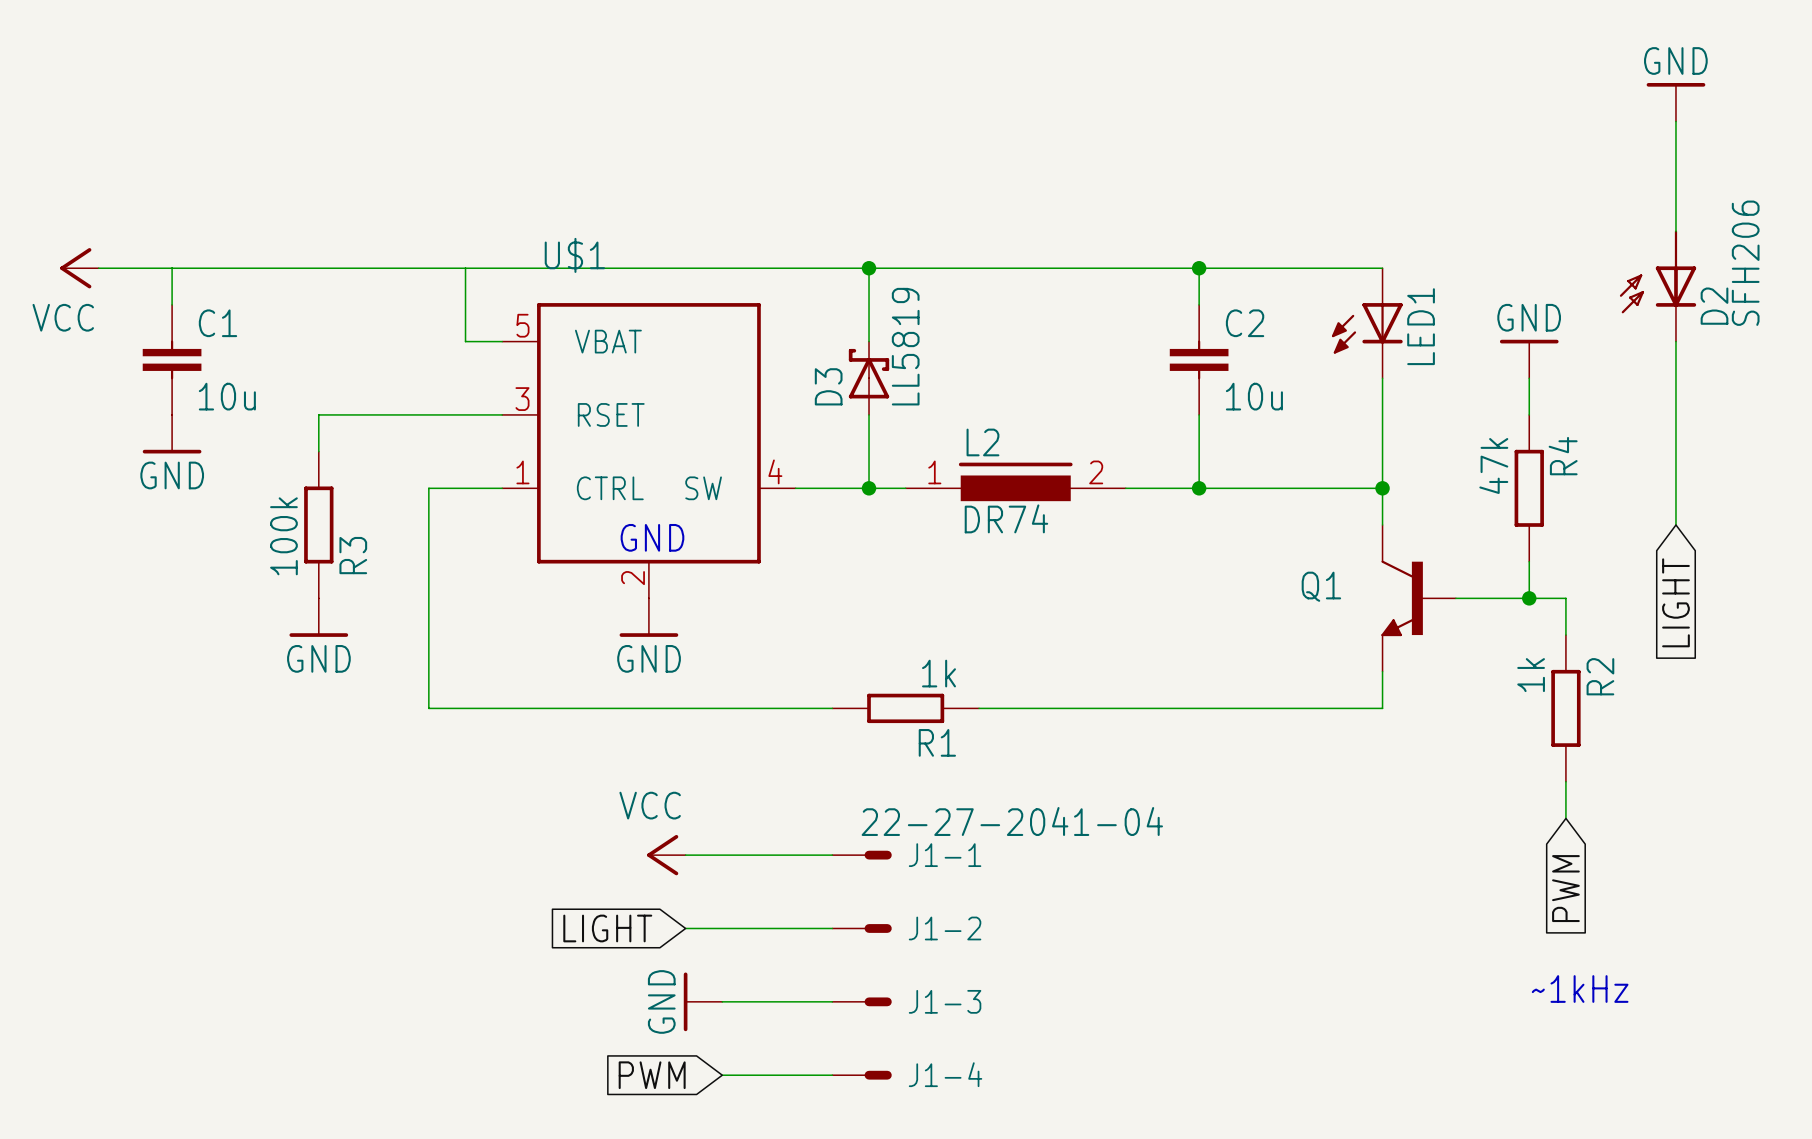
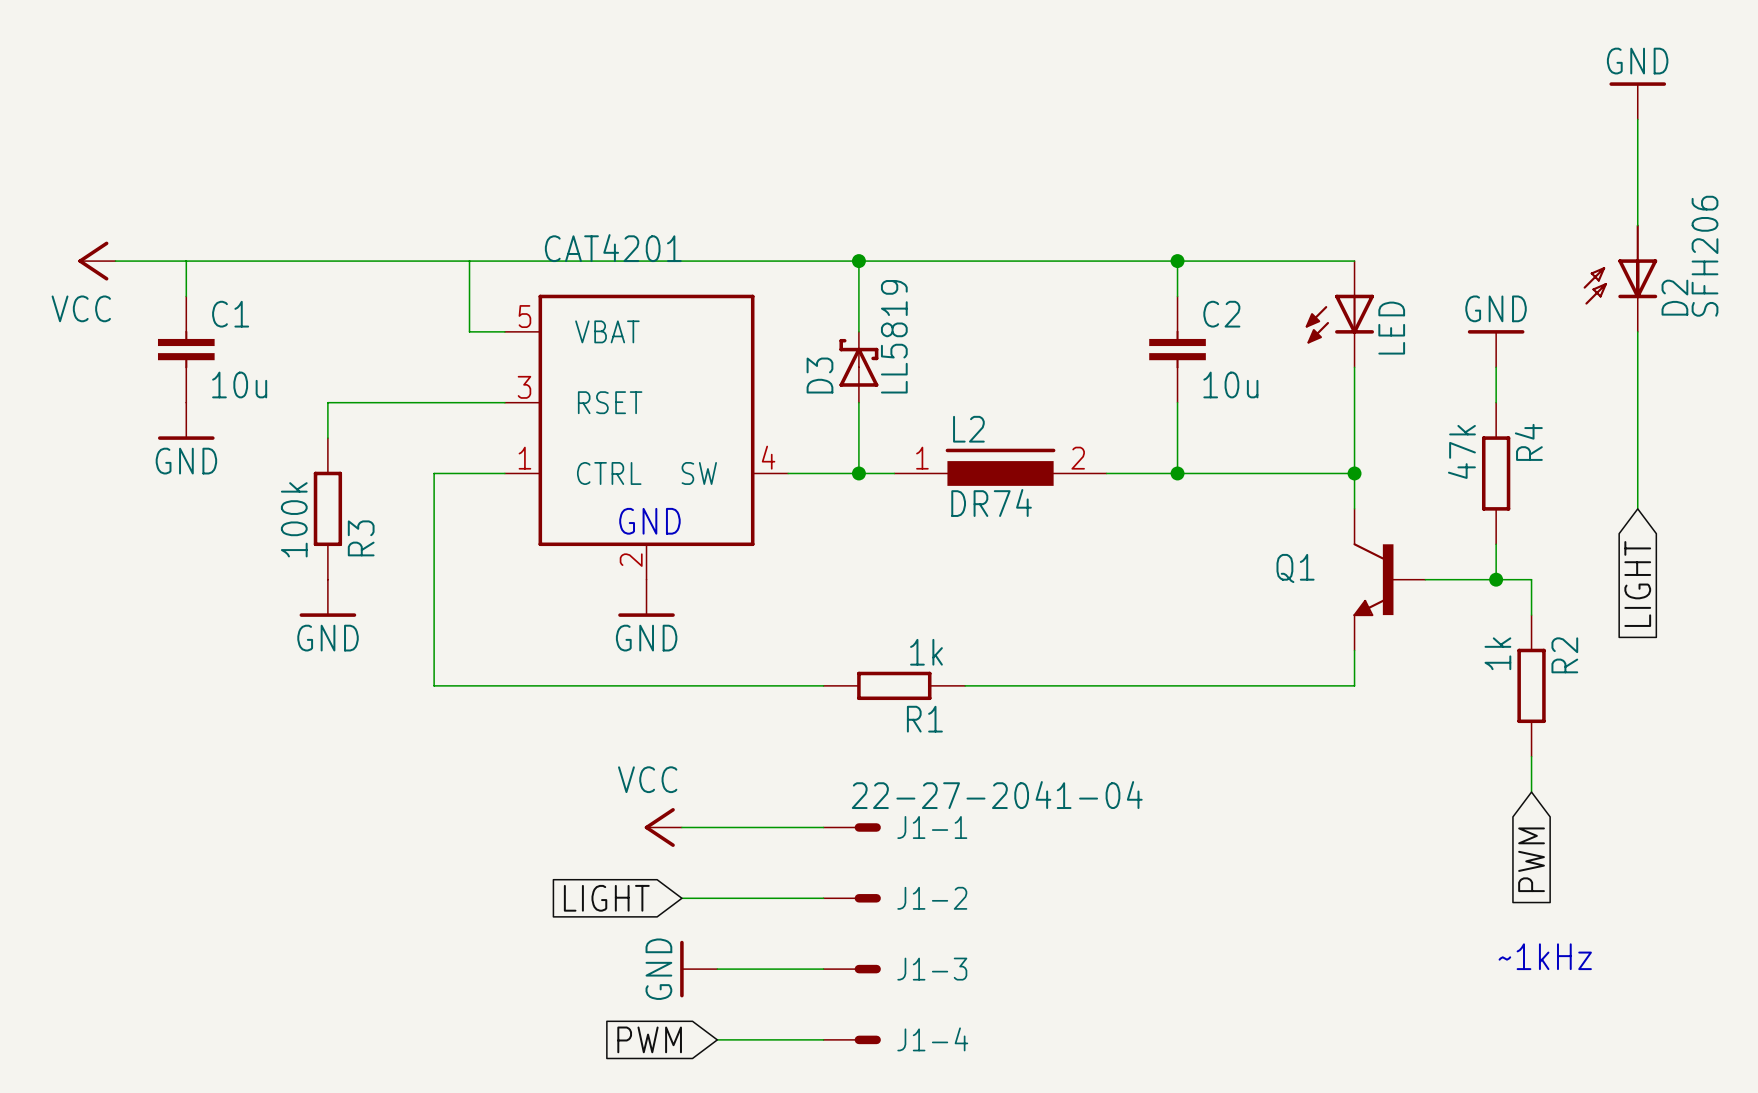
U$1 name: U$1 (574, 255) -> CAT4201 (613, 248)
LED1 name: LED1 (1421, 326) -> LED (1391, 328)

